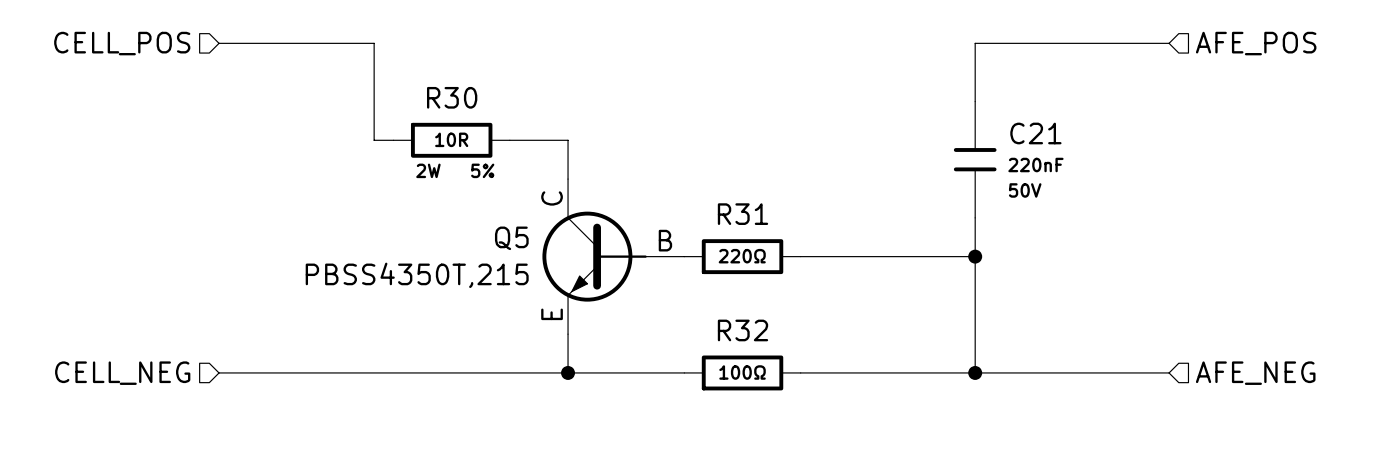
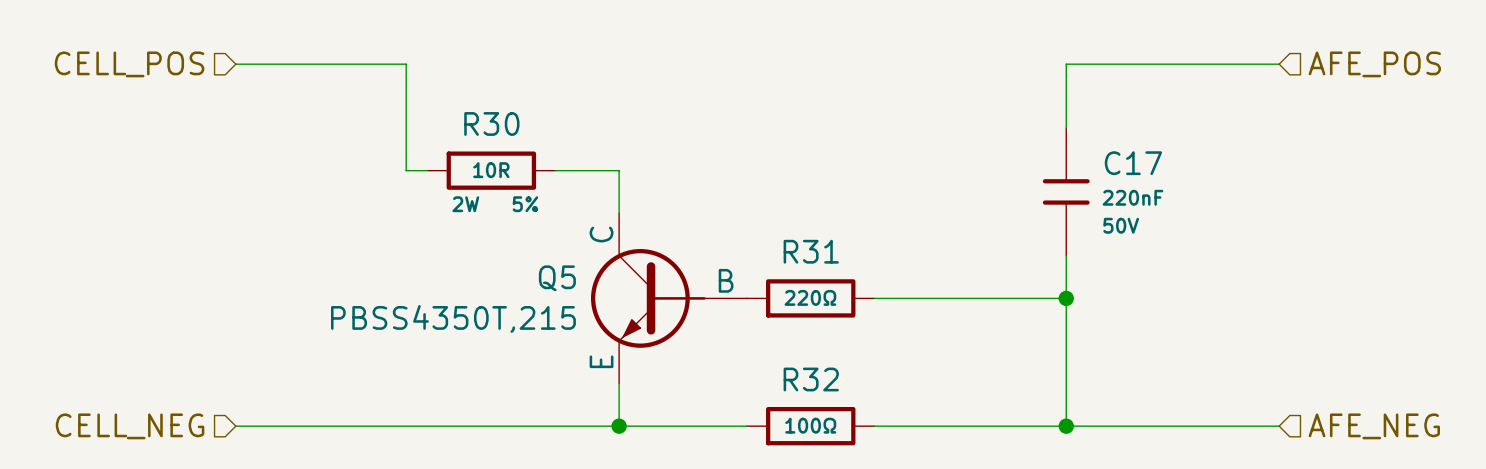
C21 name: C21 (1035, 133) -> C17 (1133, 163)

